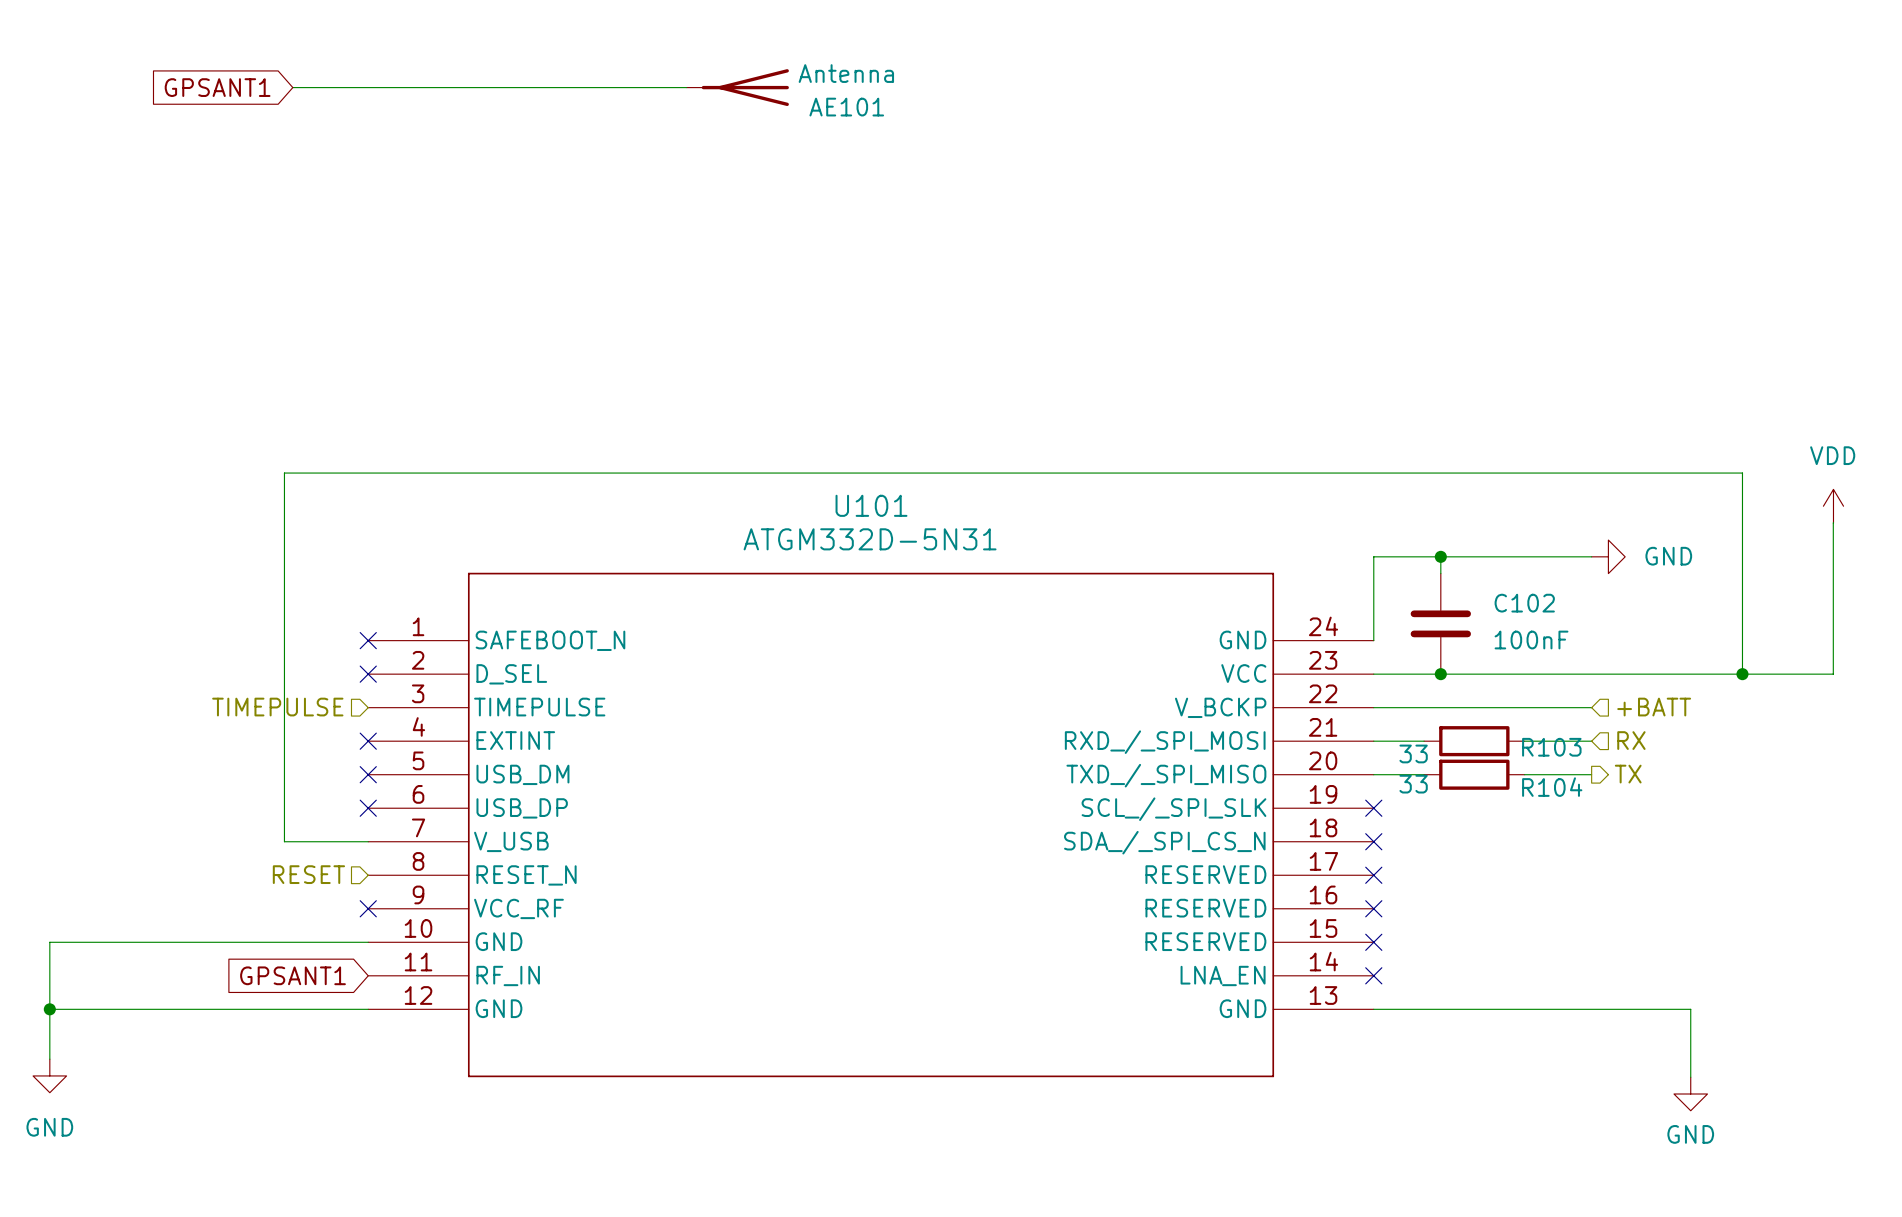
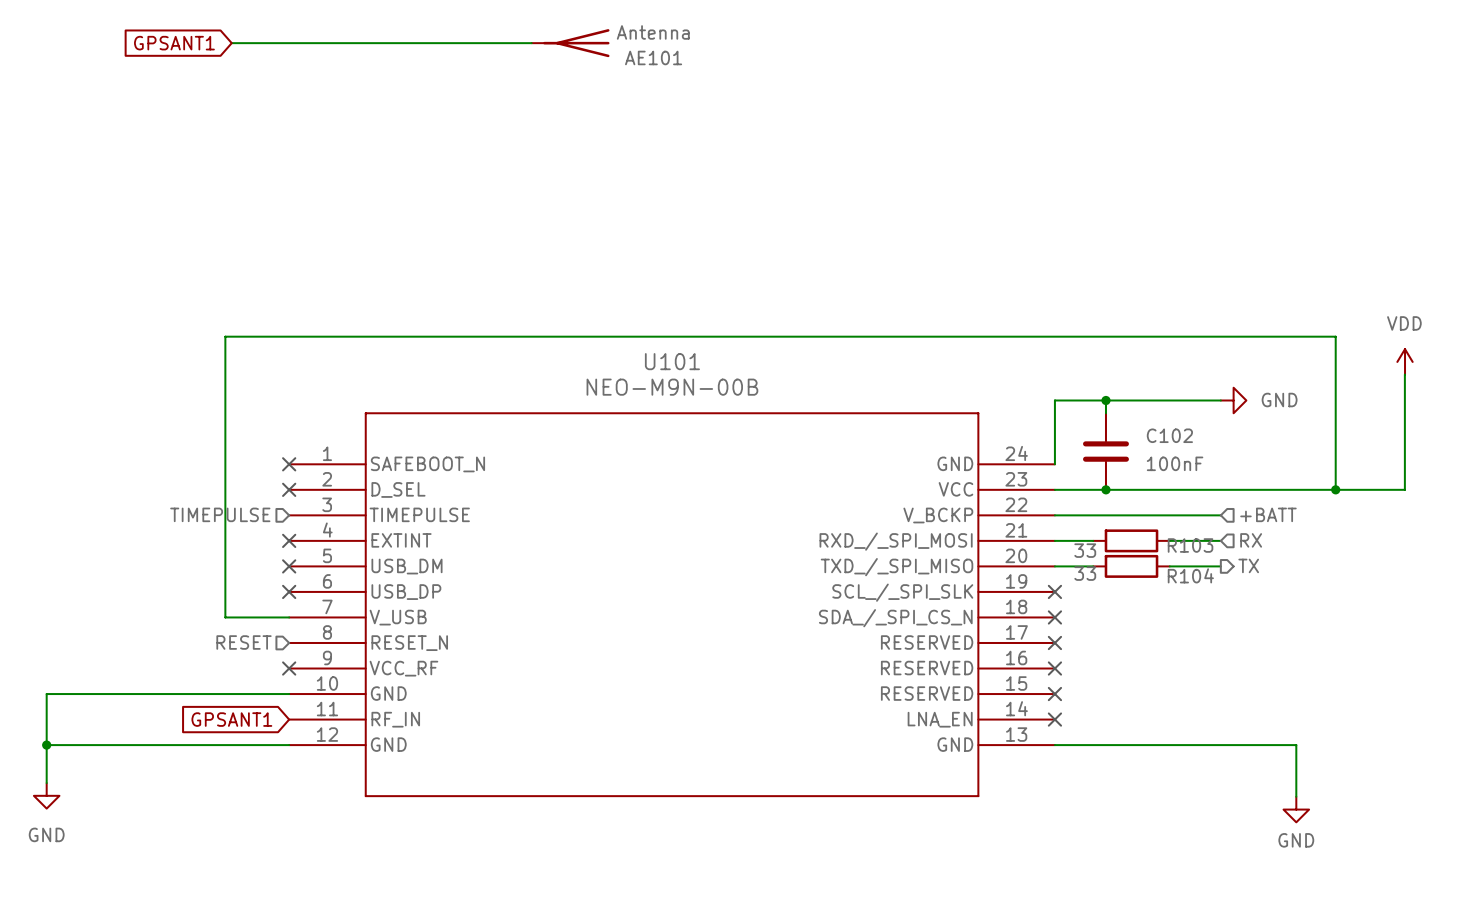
U101 value: ATGM332D-5N31 (870, 539) -> NEO-M9N-00B (672, 387)

